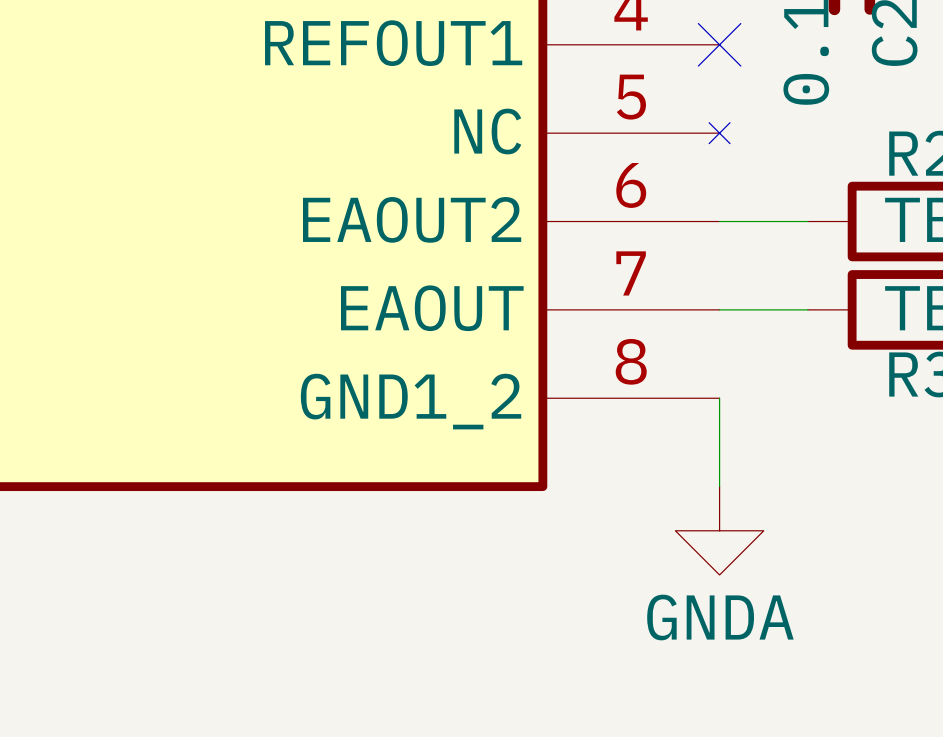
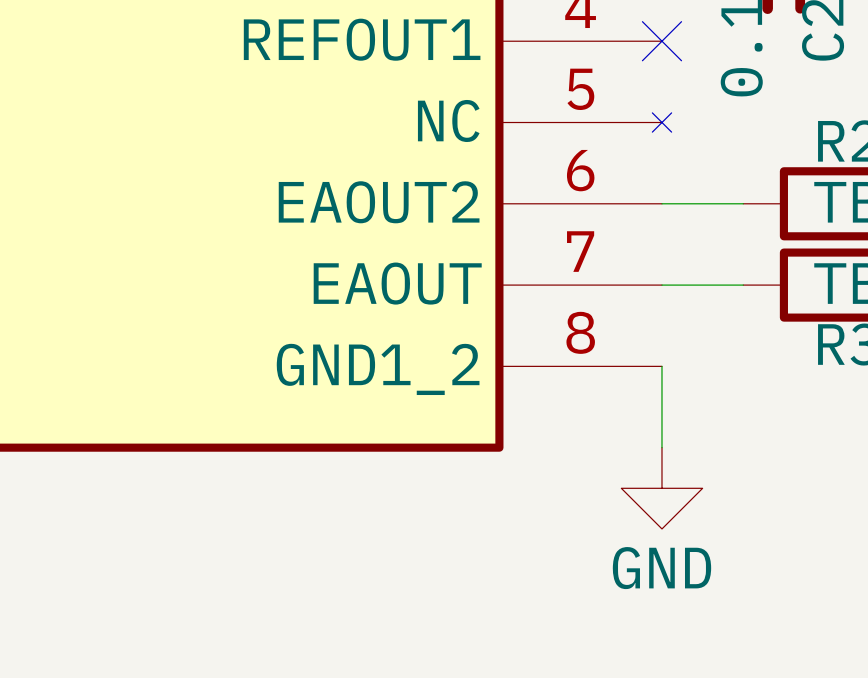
power symbol: GNDA (719, 530) -> GND (661, 488)

